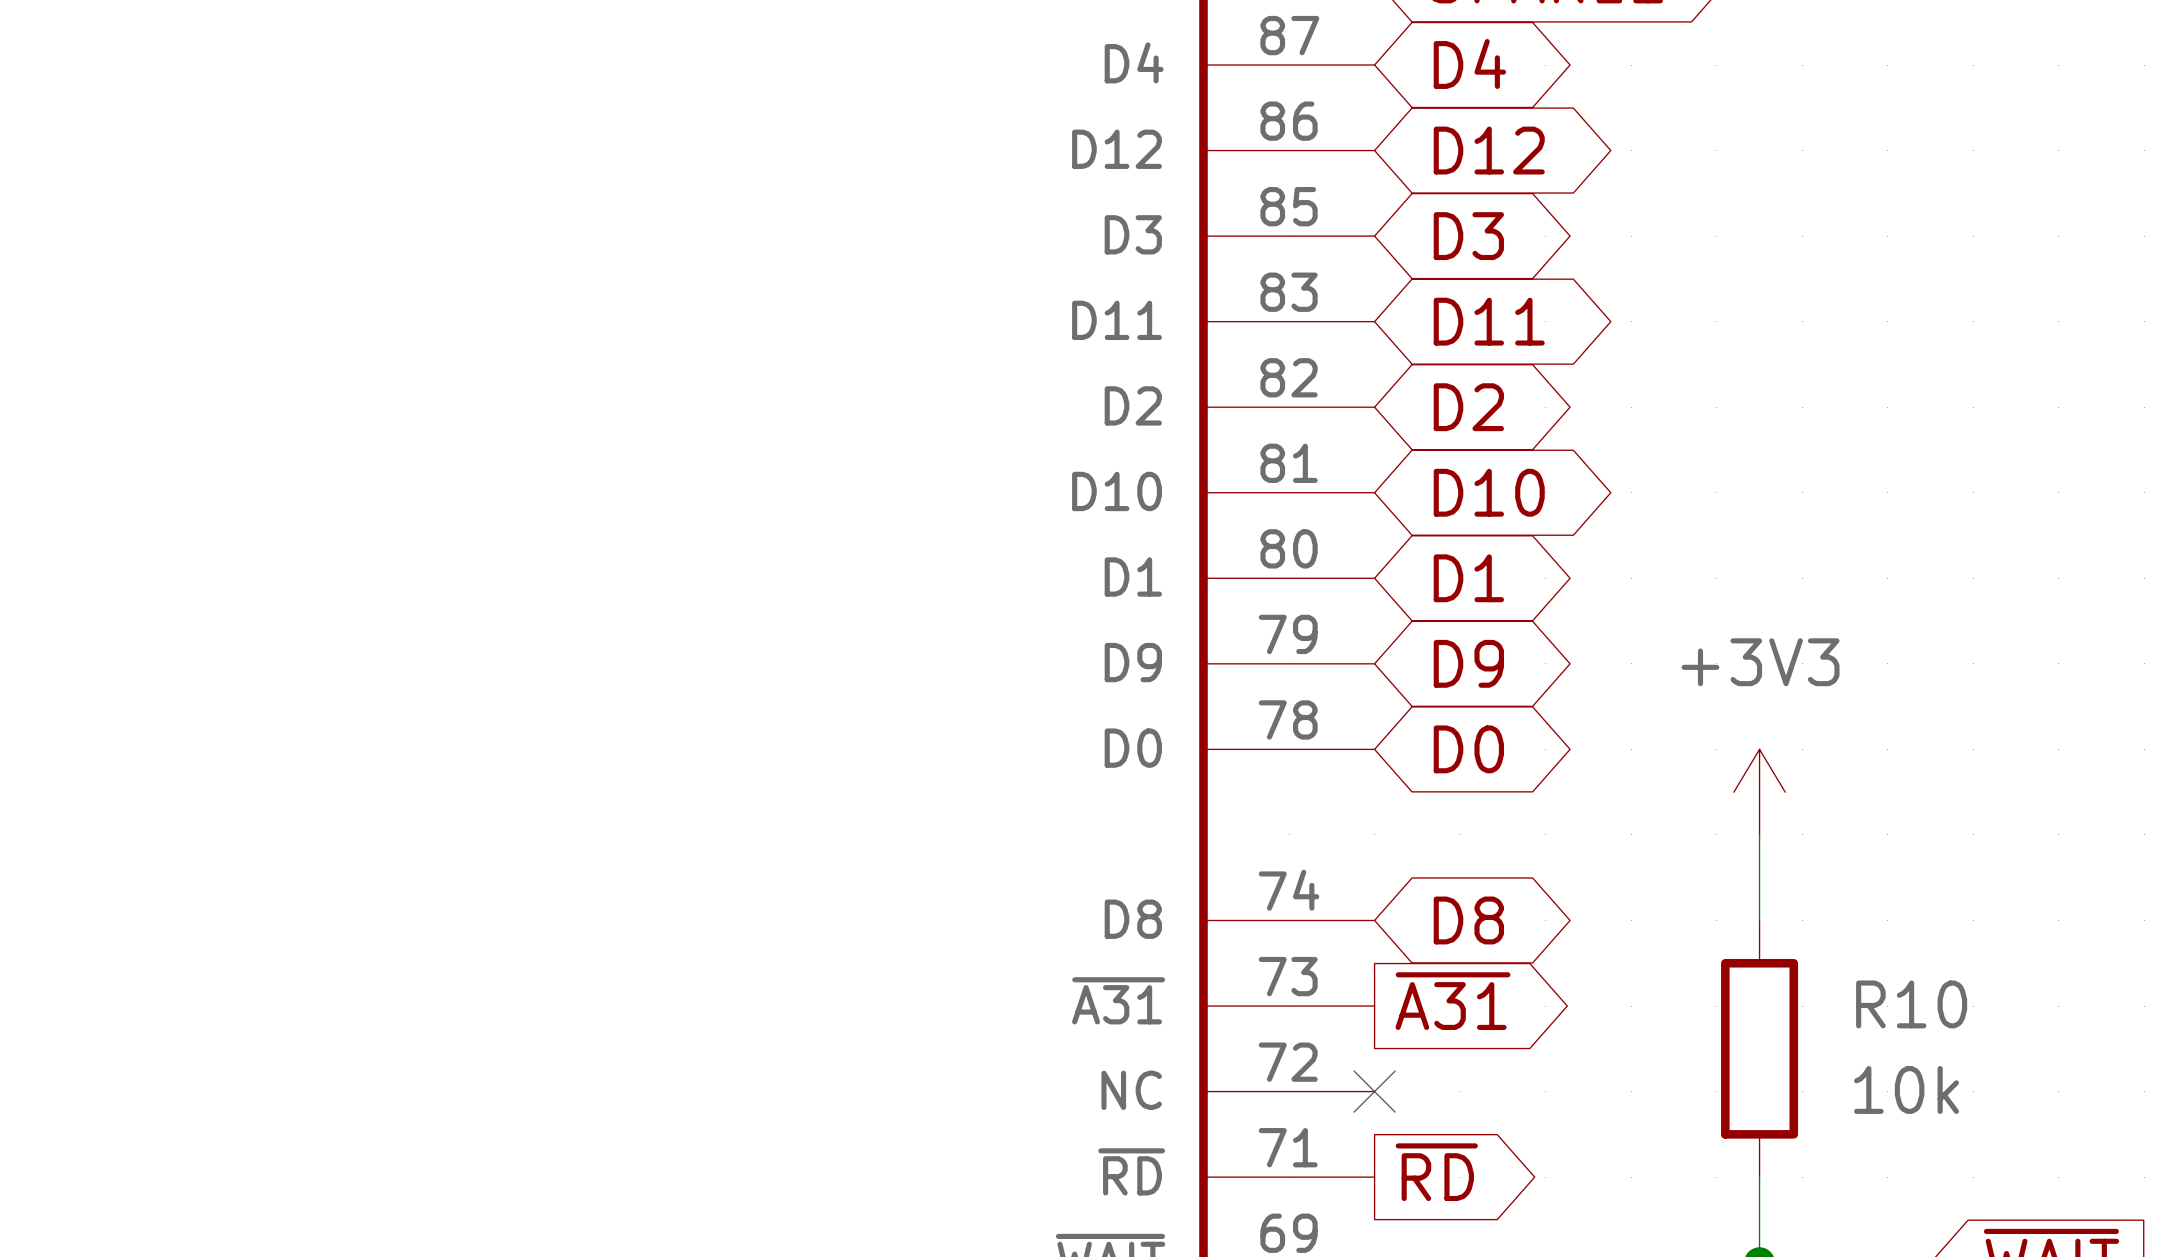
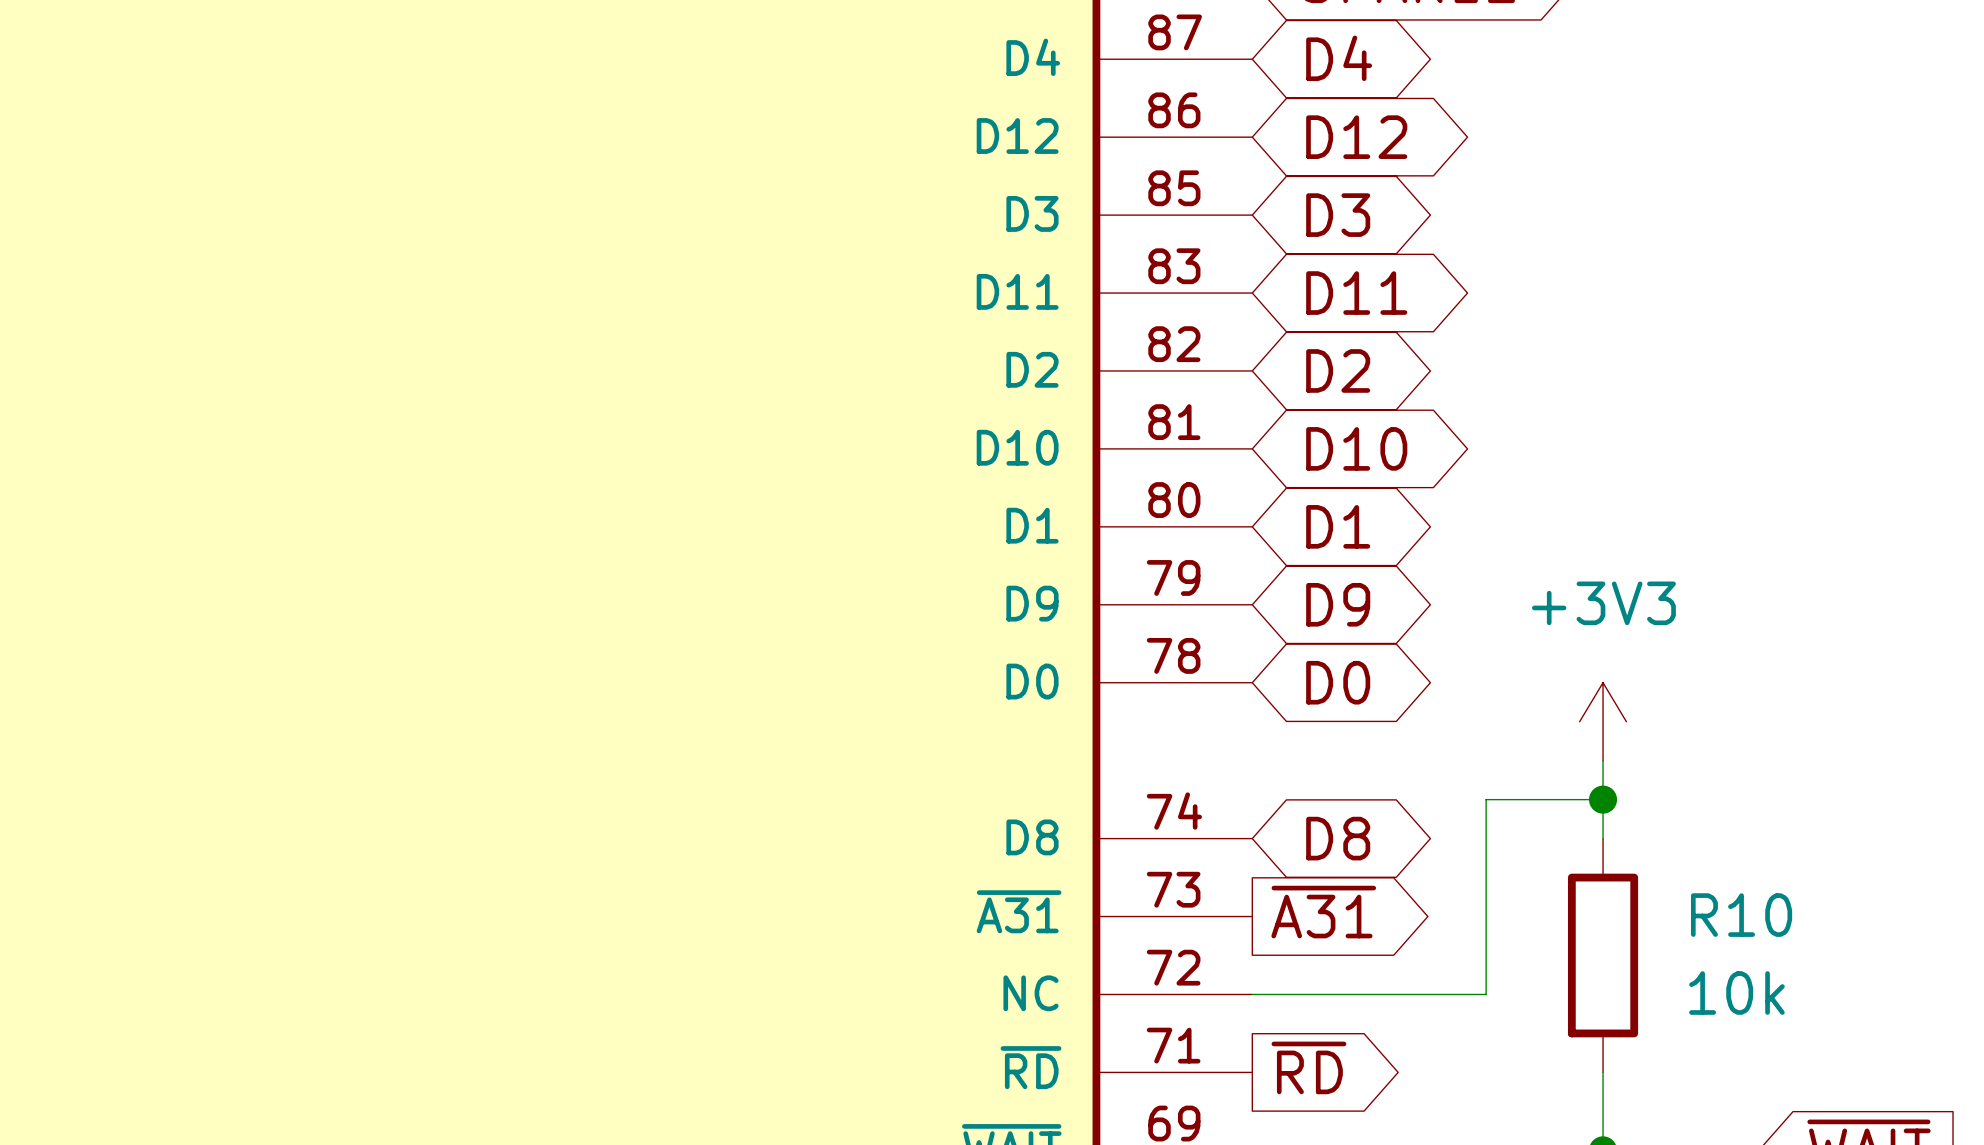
wire: none -> (1603, 799) (1486, 799) (1486, 994) (1252, 994)
junction: none -> (1603, 799)
no-connect mark: (1374, 1091) -> none

